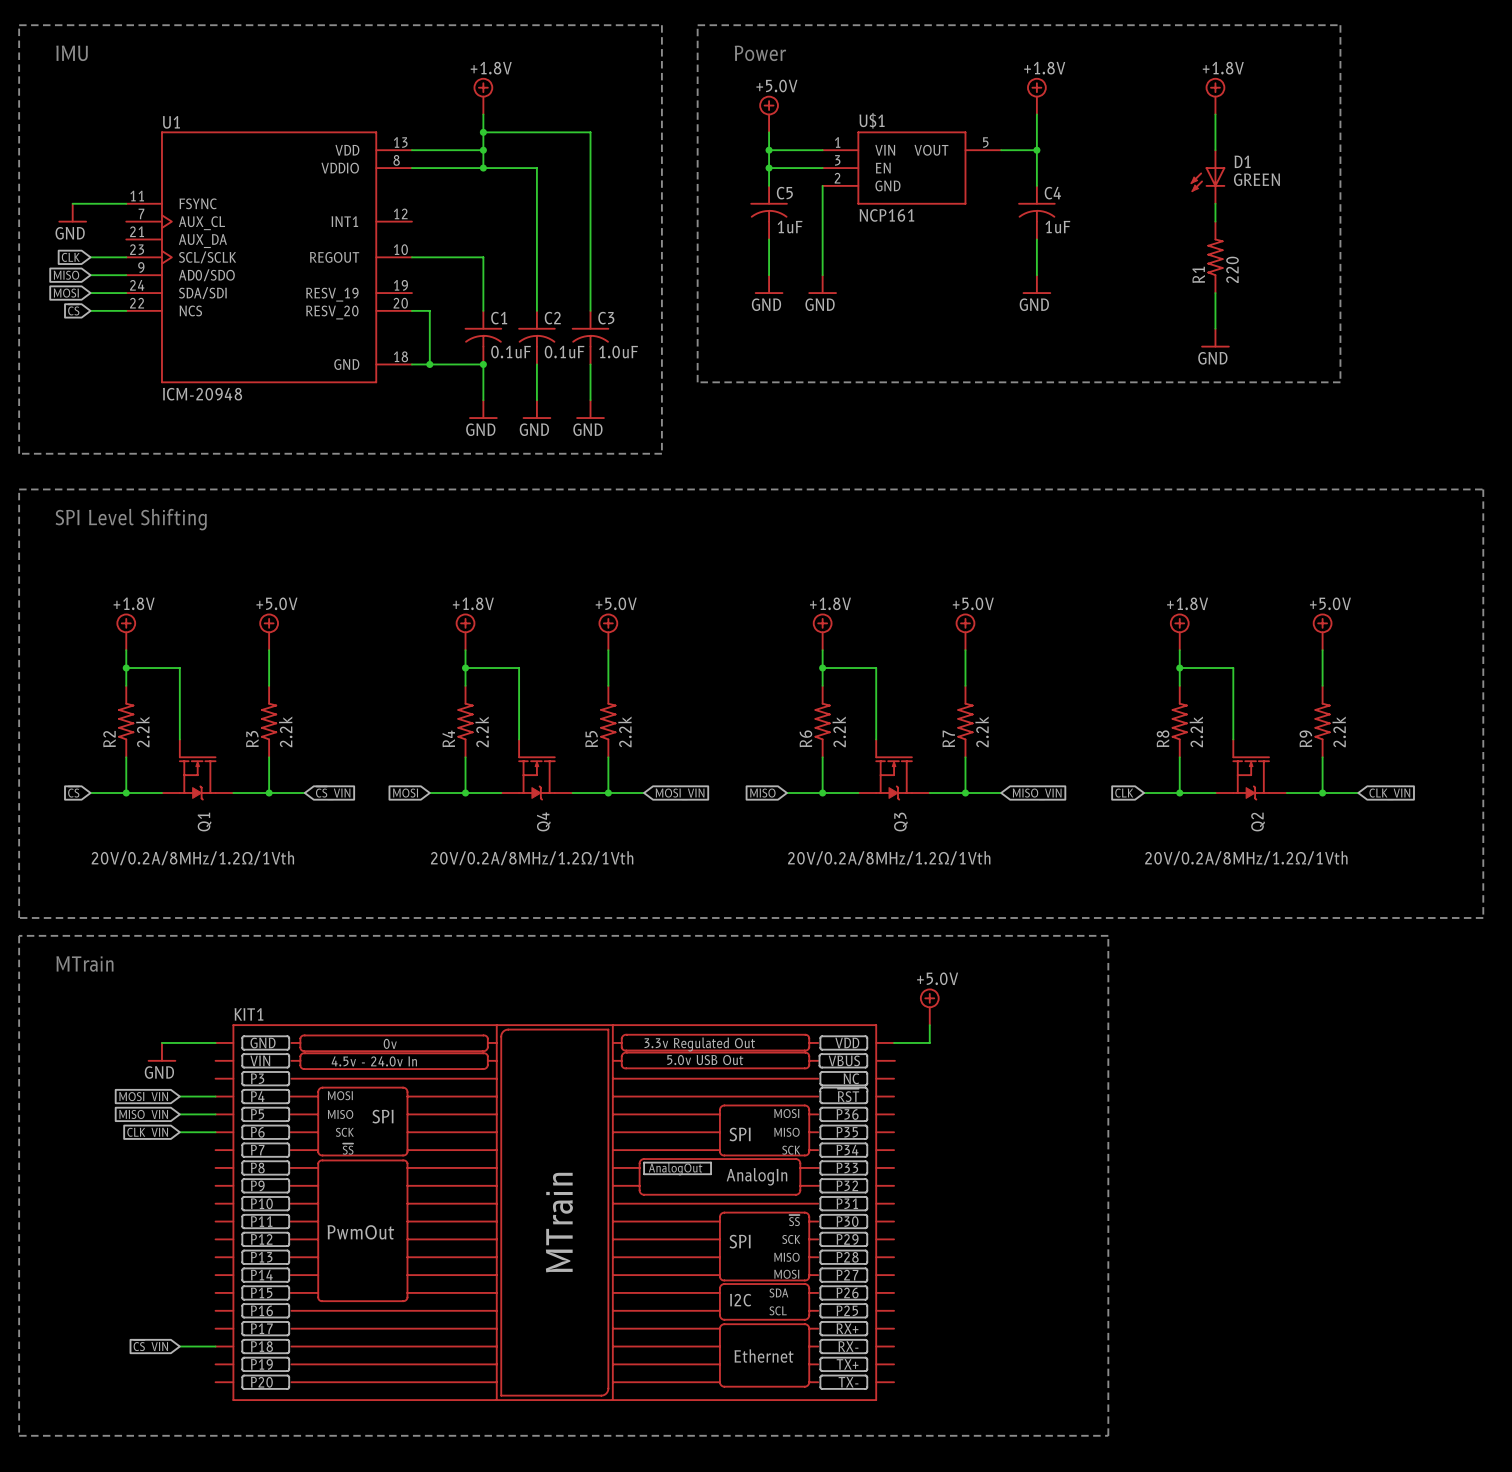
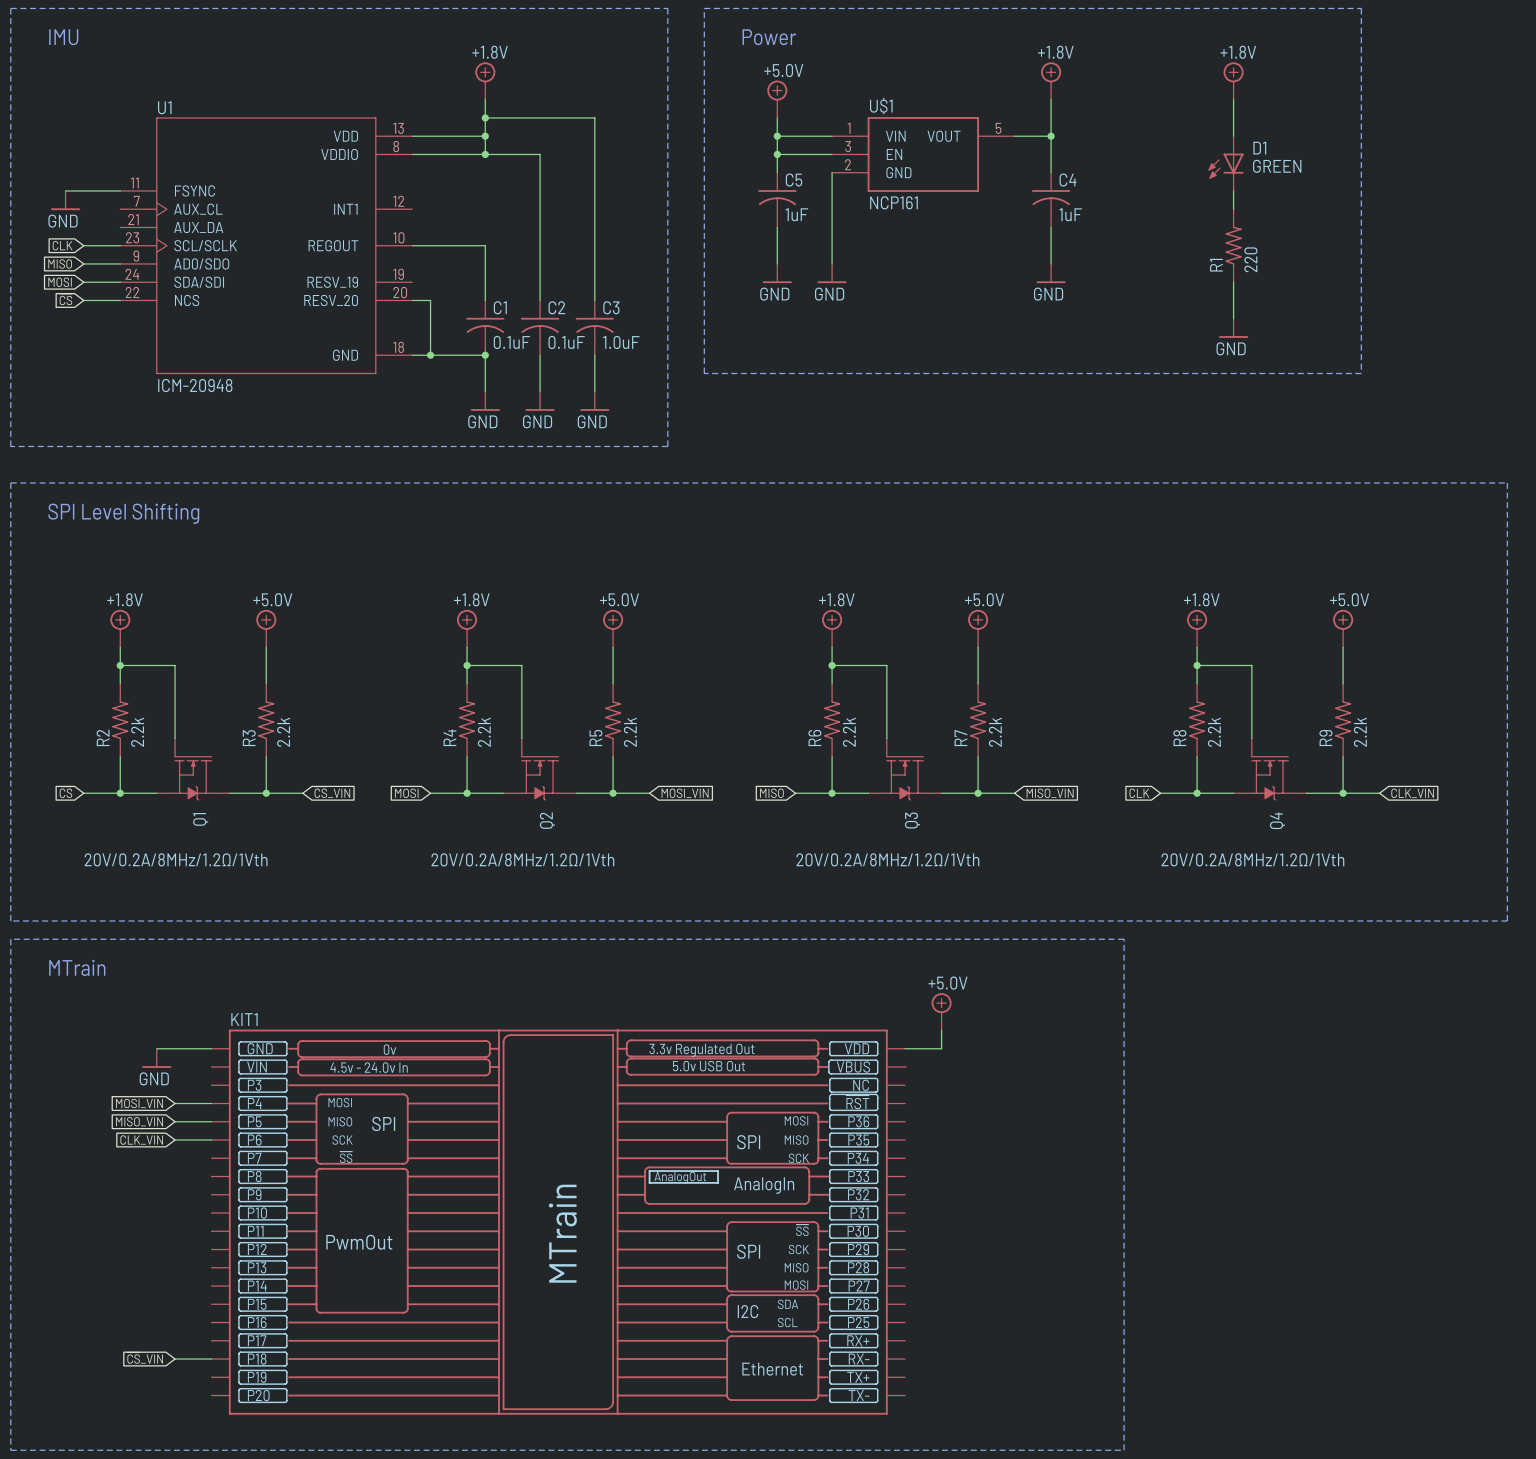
Q4 name: Q4 (543, 821) -> Q2 (547, 820)
Q2 name: Q2 (1258, 822) -> Q4 (1277, 820)

